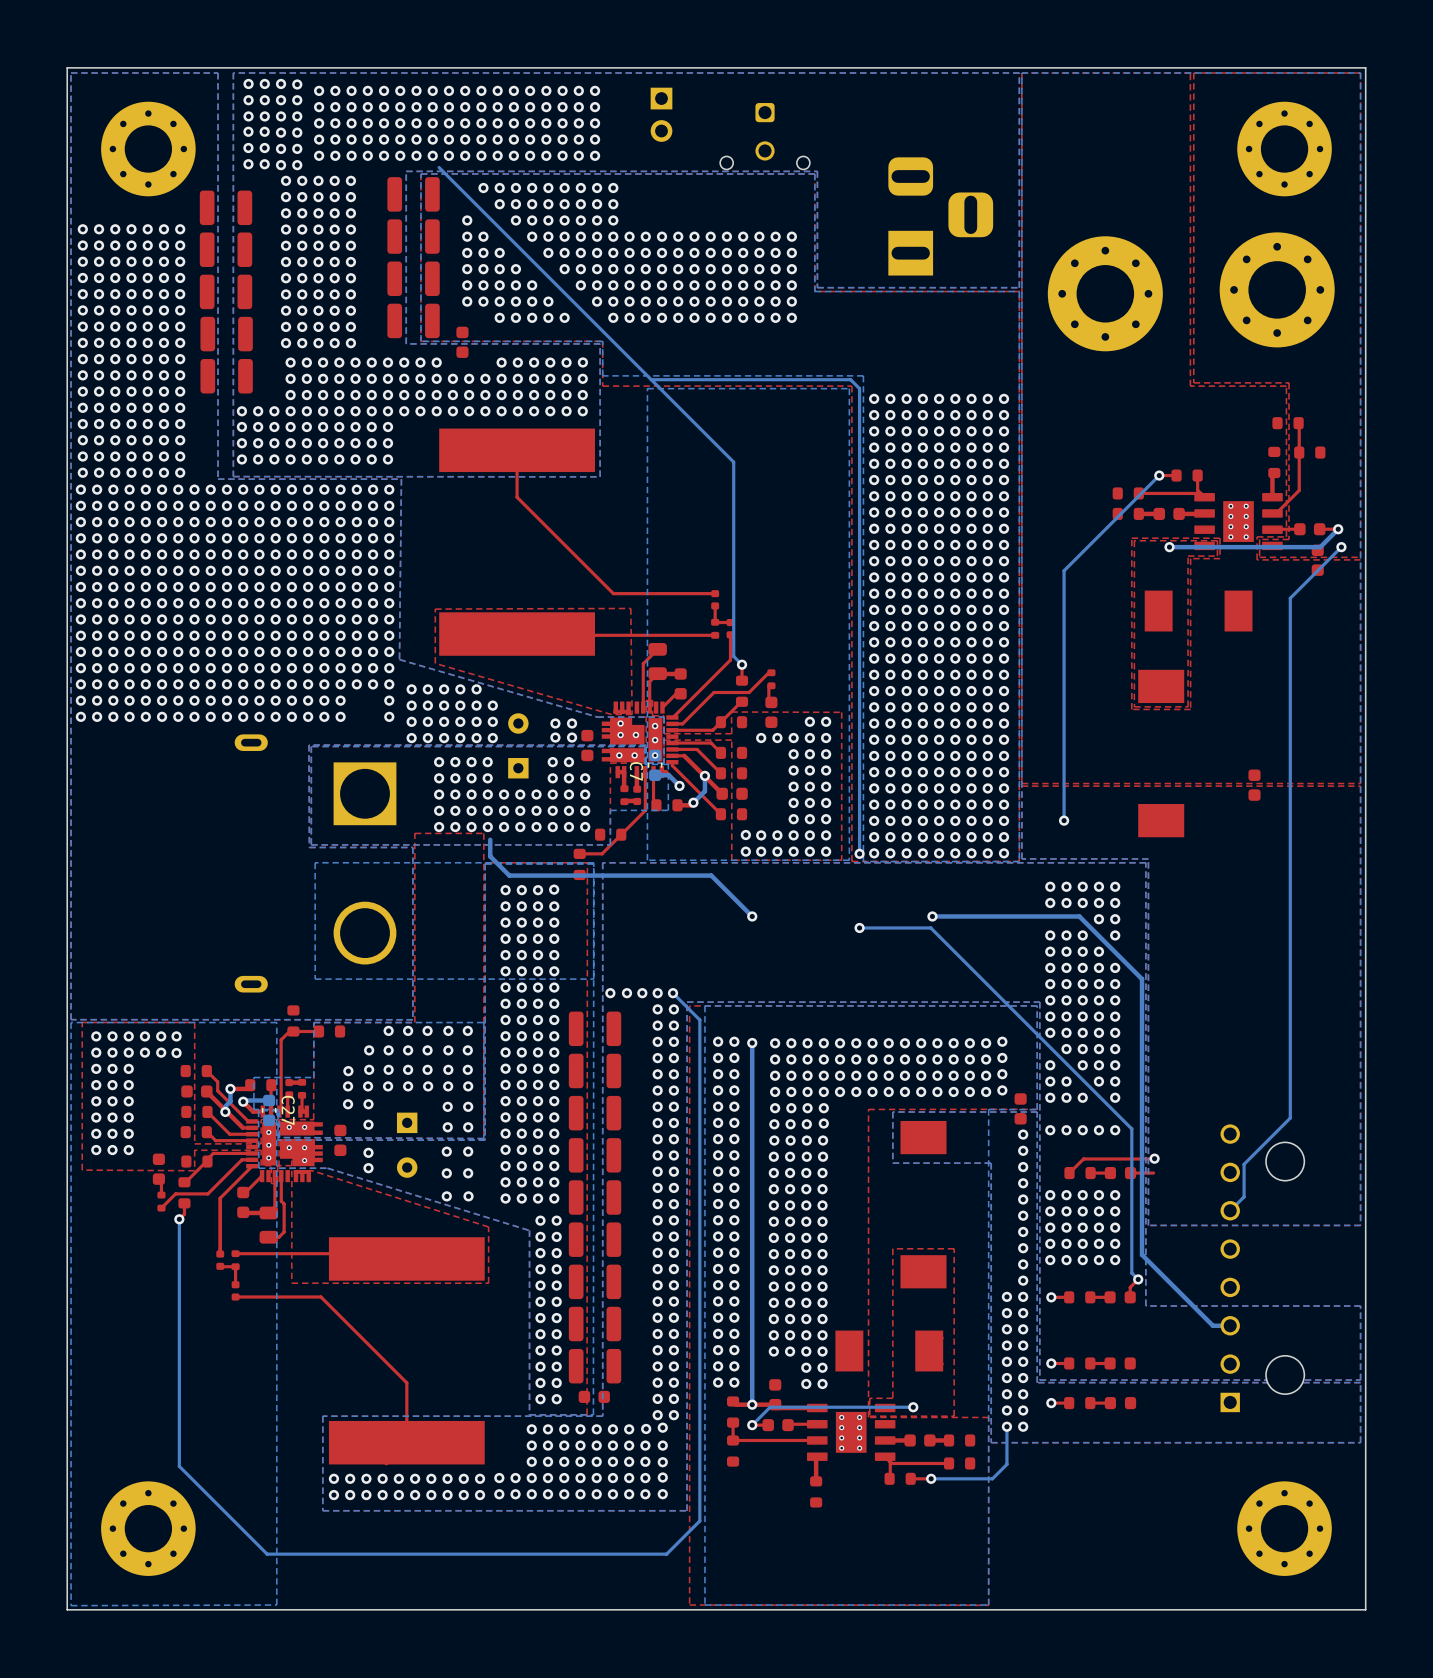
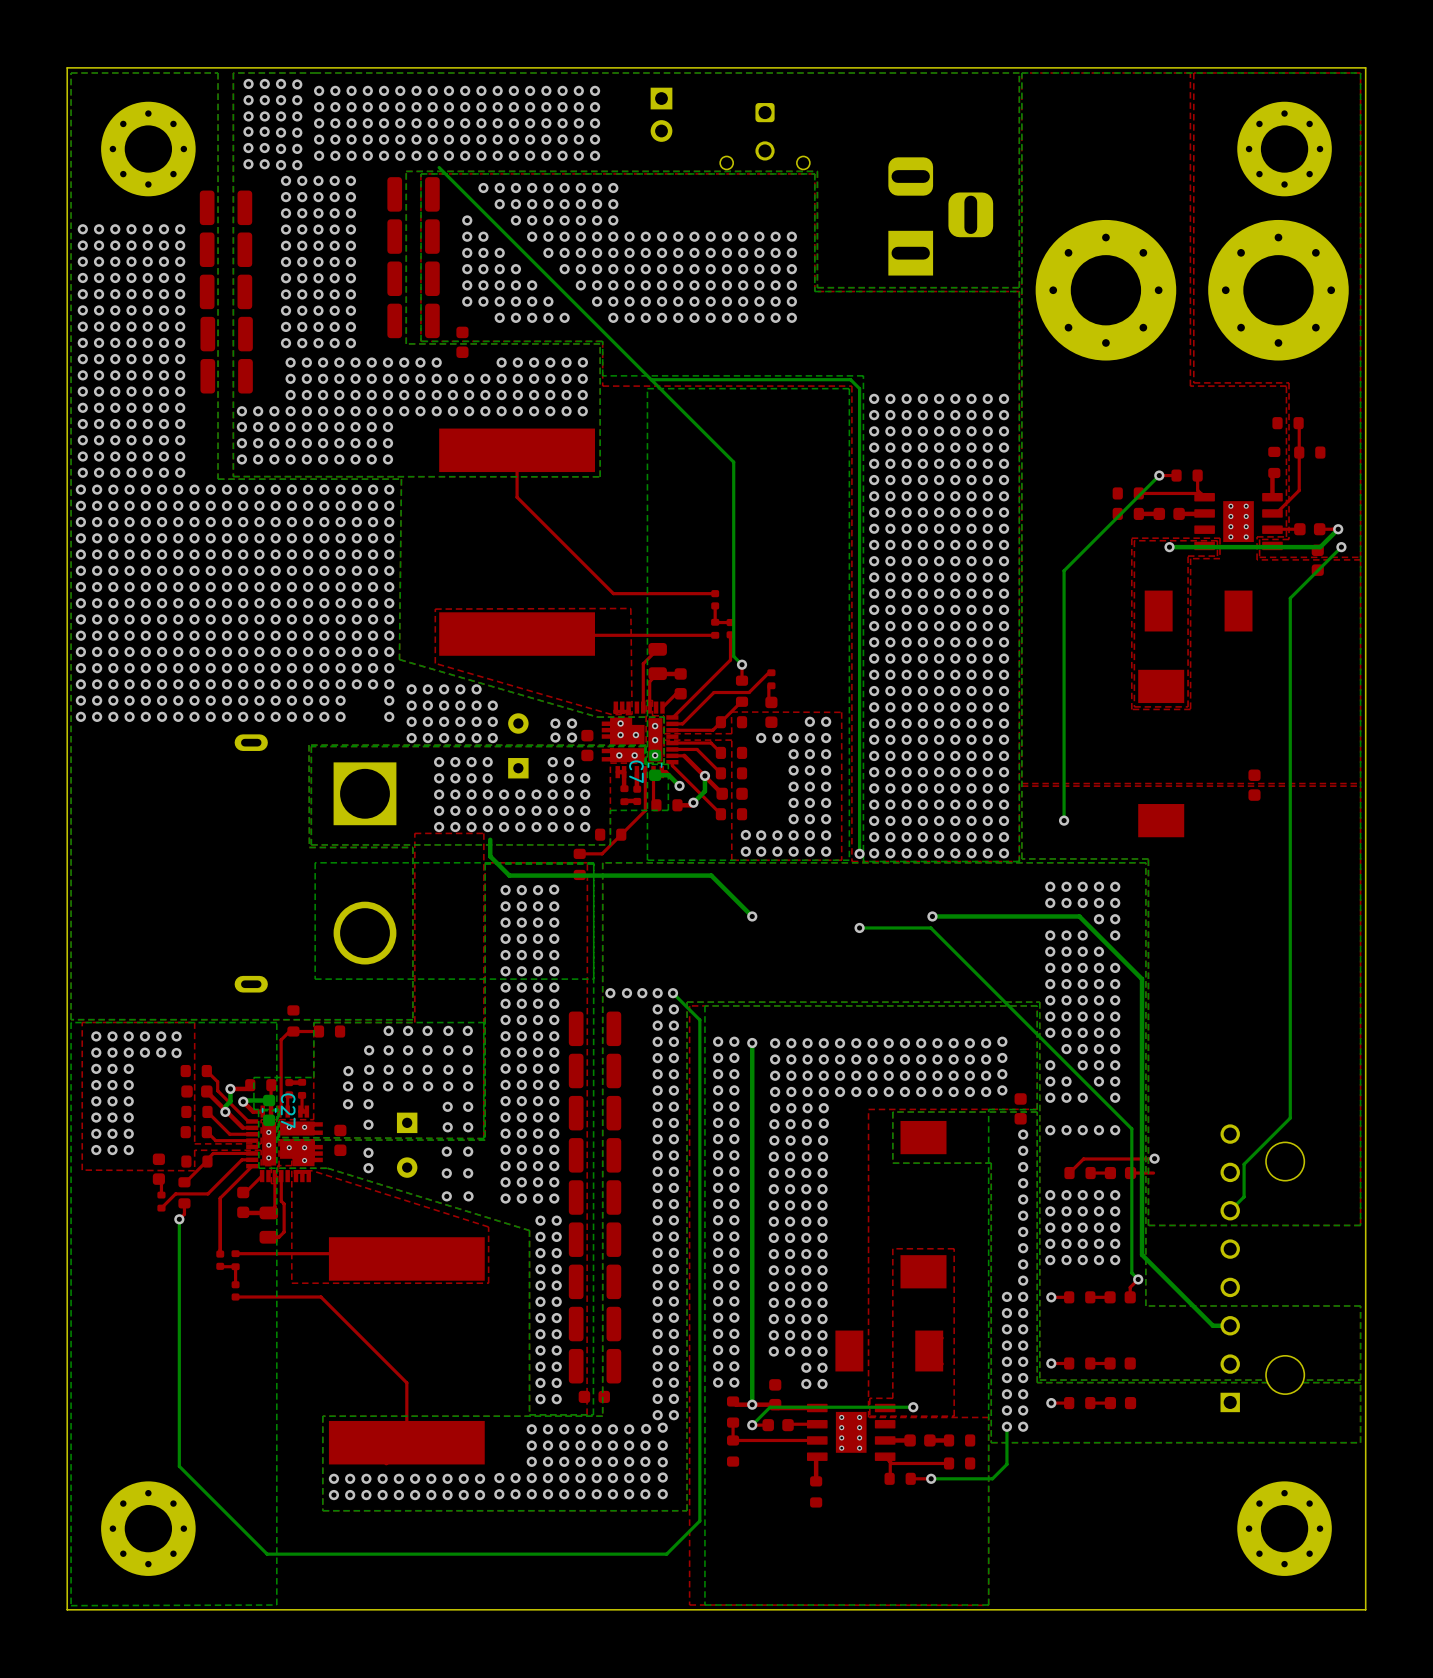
part footprint: [1219, 232, 1335, 348] -> [1208, 219, 1349, 361]
part footprint: [1047, 236, 1163, 352] -> [1035, 219, 1177, 361]

